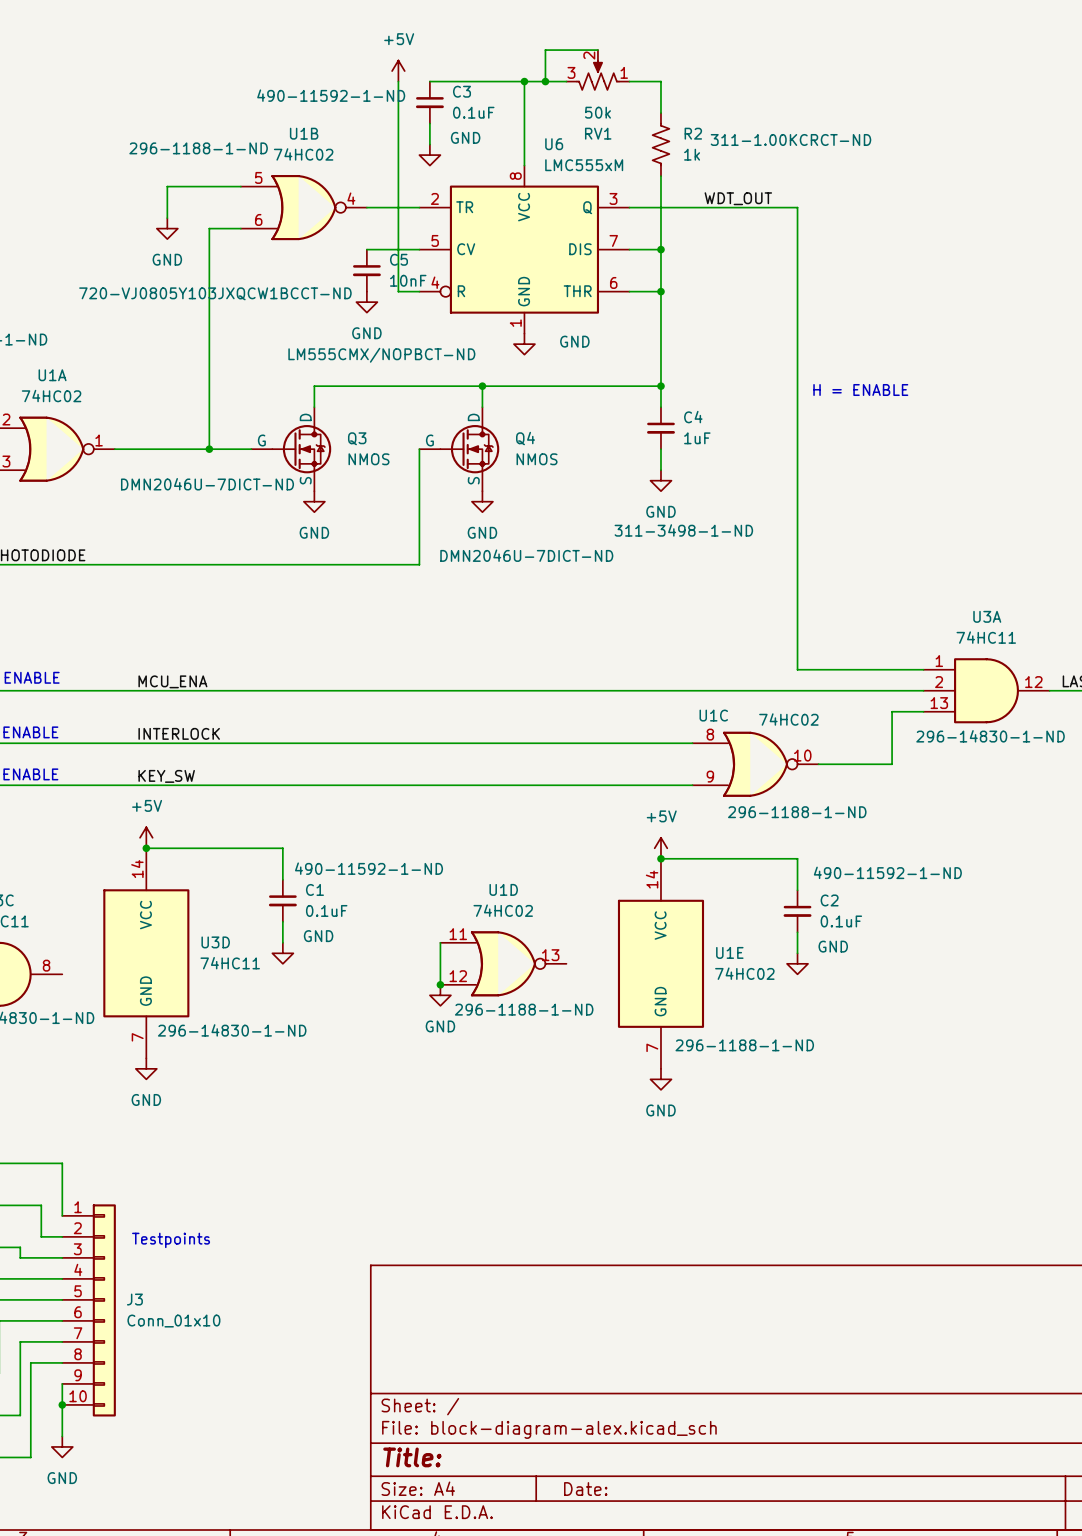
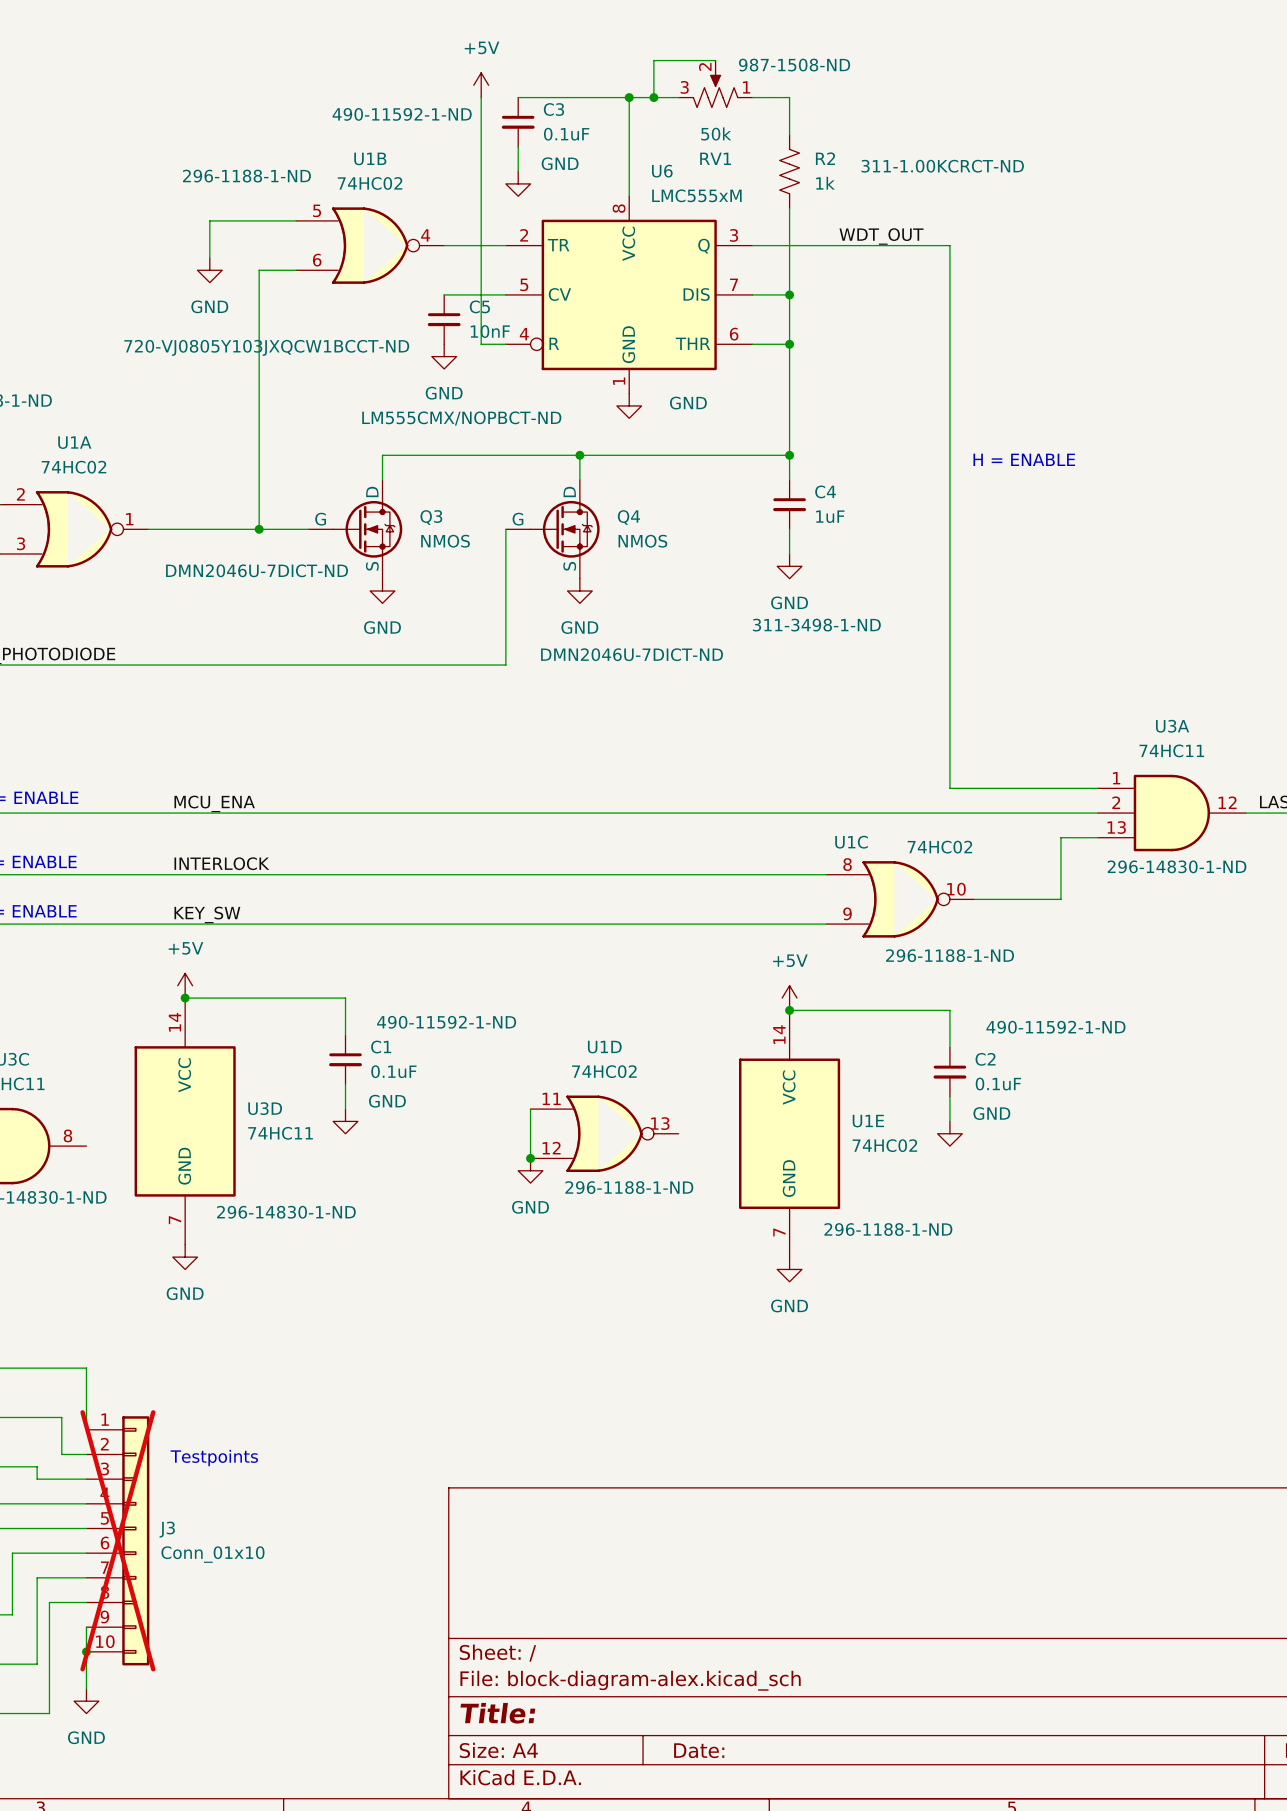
RV1 text: none -> 987-1508-ND (794, 65)
J3 do-not-place cross: none -> (117, 1540)

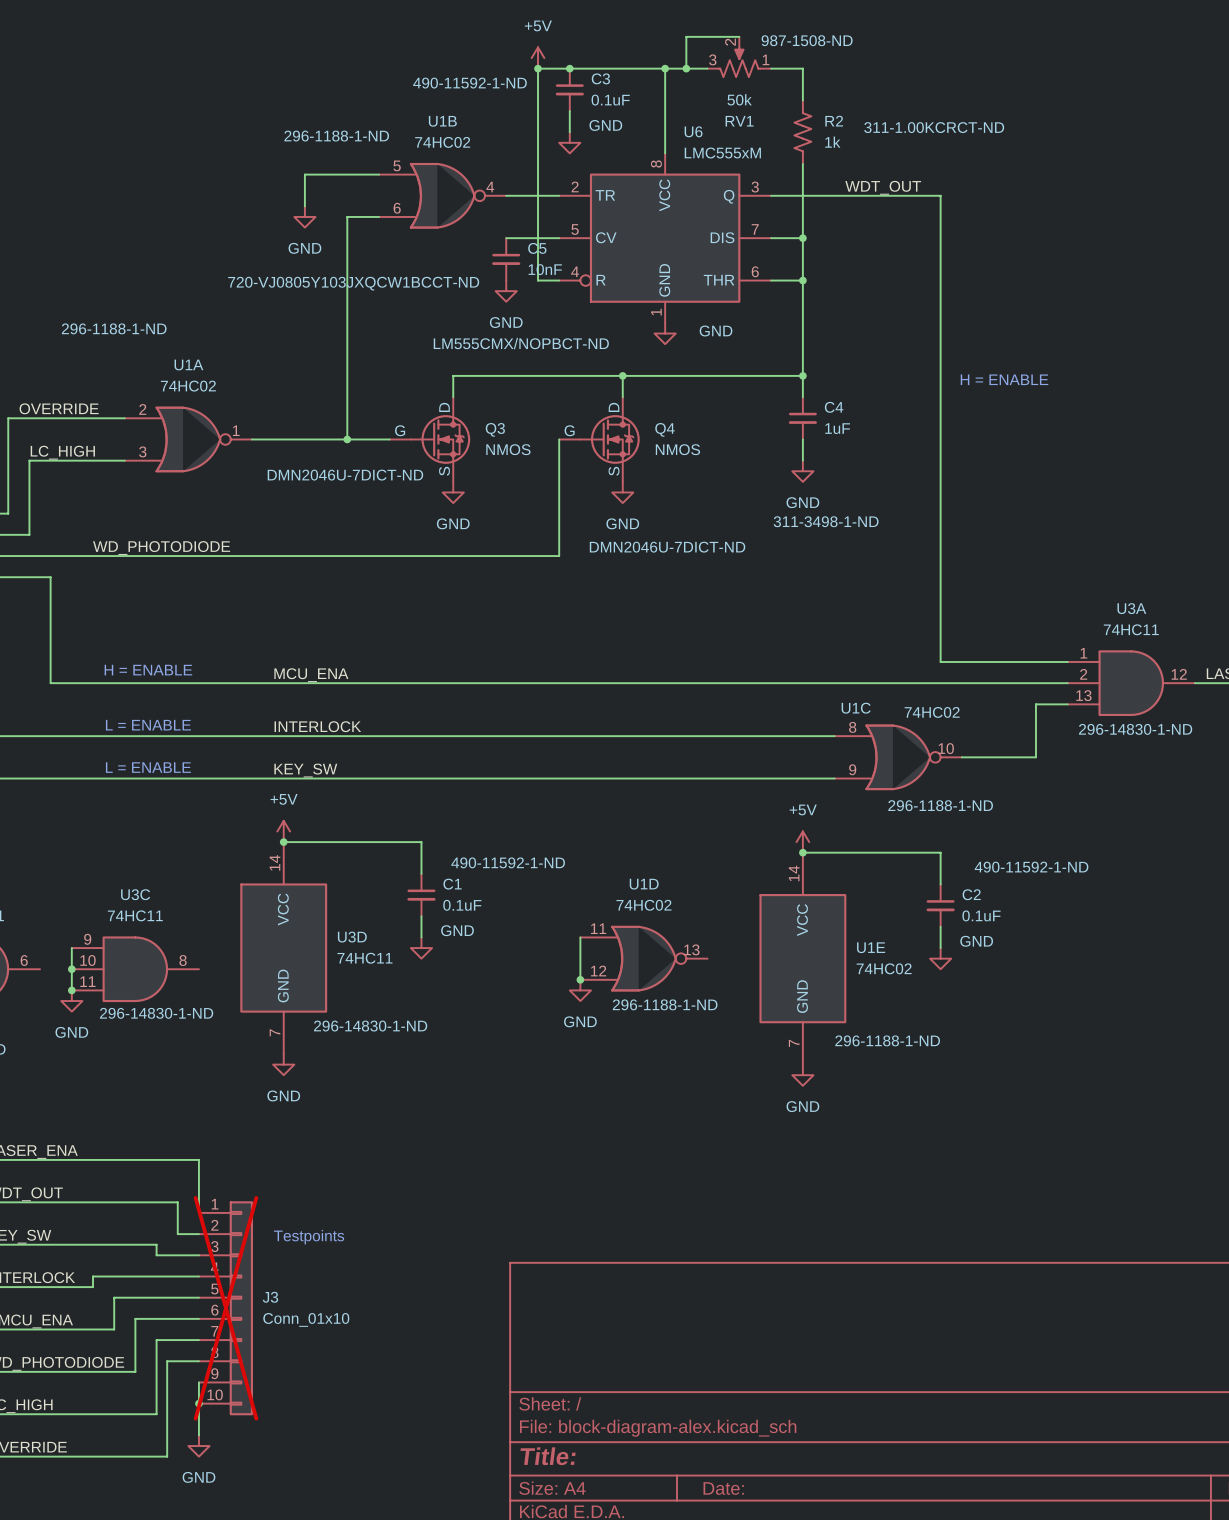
wire: none -> (538, 68) (569, 68)
junction: none -> (538, 68)
junction: none -> (569, 68)

